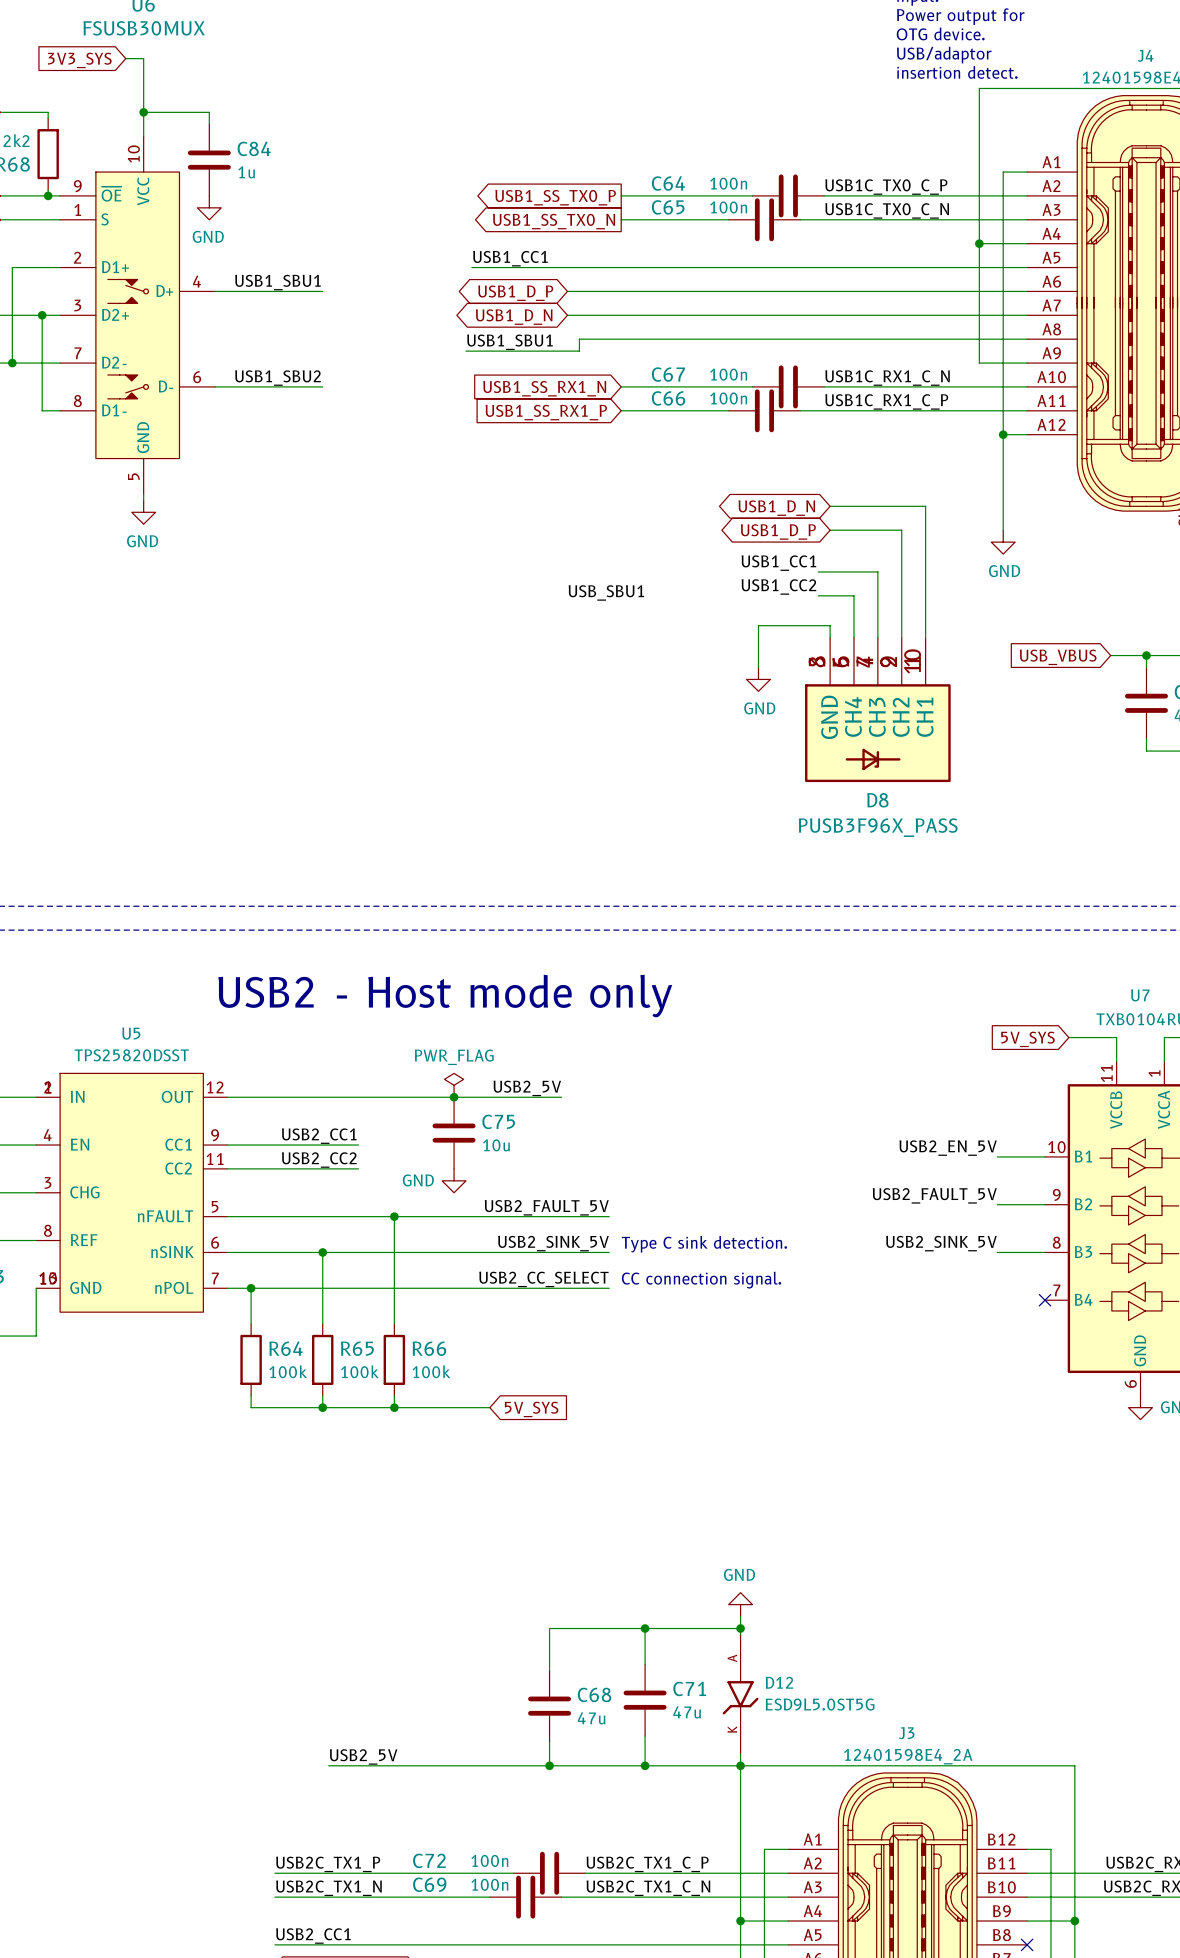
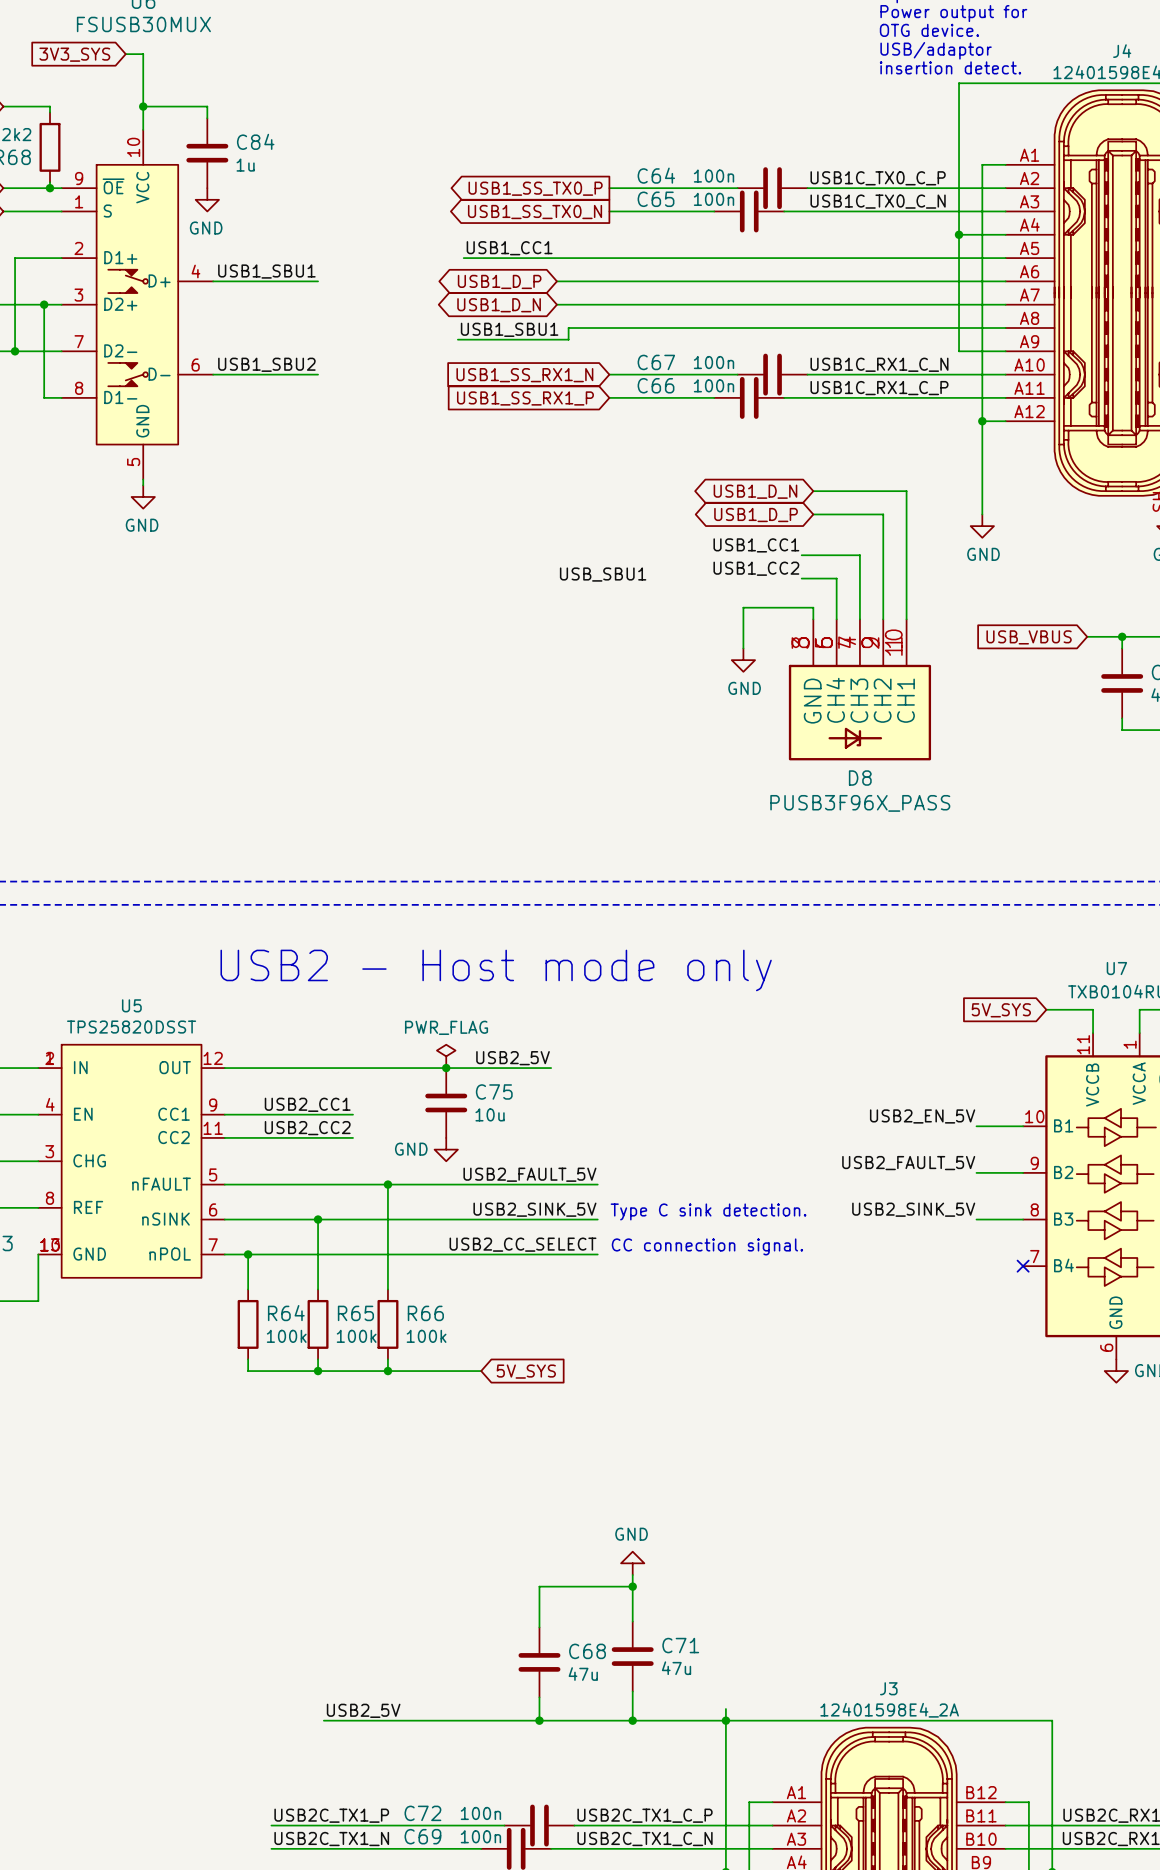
power symbol position: GND (740, 1604) -> GND (632, 1563)
wire: (740, 1616) (740, 1634) -> none
wire: (645, 1628) (740, 1628) -> (632, 1586) (632, 1574)
junction: (740, 1628) -> none
D12: ESD9L5.0ST5G (740, 1694) -> none

